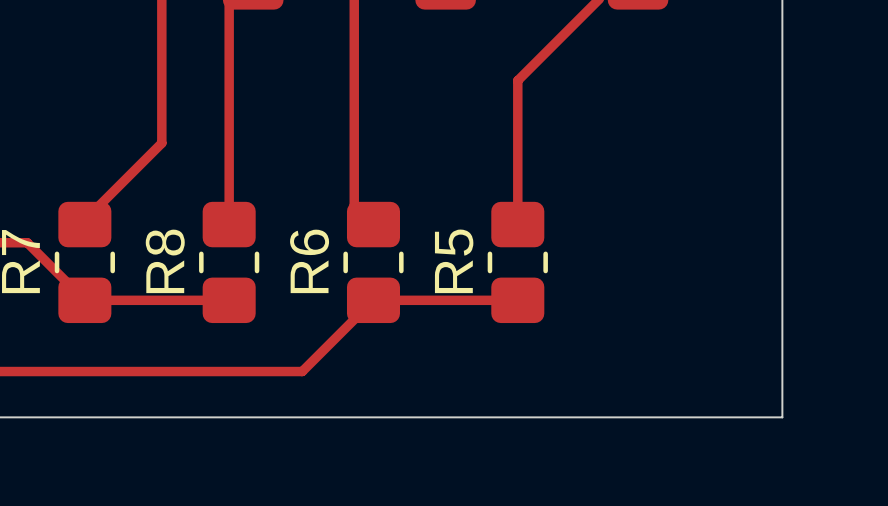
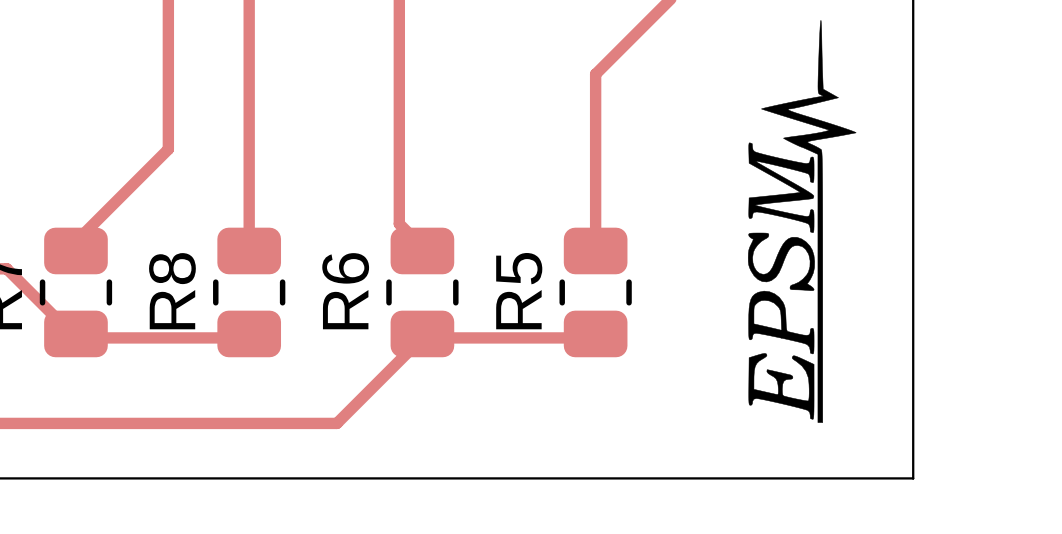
drawing: none -> [747, 20, 857, 423]
R7 footprint: [54, 201, 115, 324] -> [39, 227, 113, 358]
R8 footprint: [199, 201, 260, 324] -> [213, 227, 286, 358]
R6 footprint: [343, 201, 404, 324] -> [386, 227, 459, 358]
R5 footprint: [487, 201, 548, 324] -> [559, 227, 632, 358]

